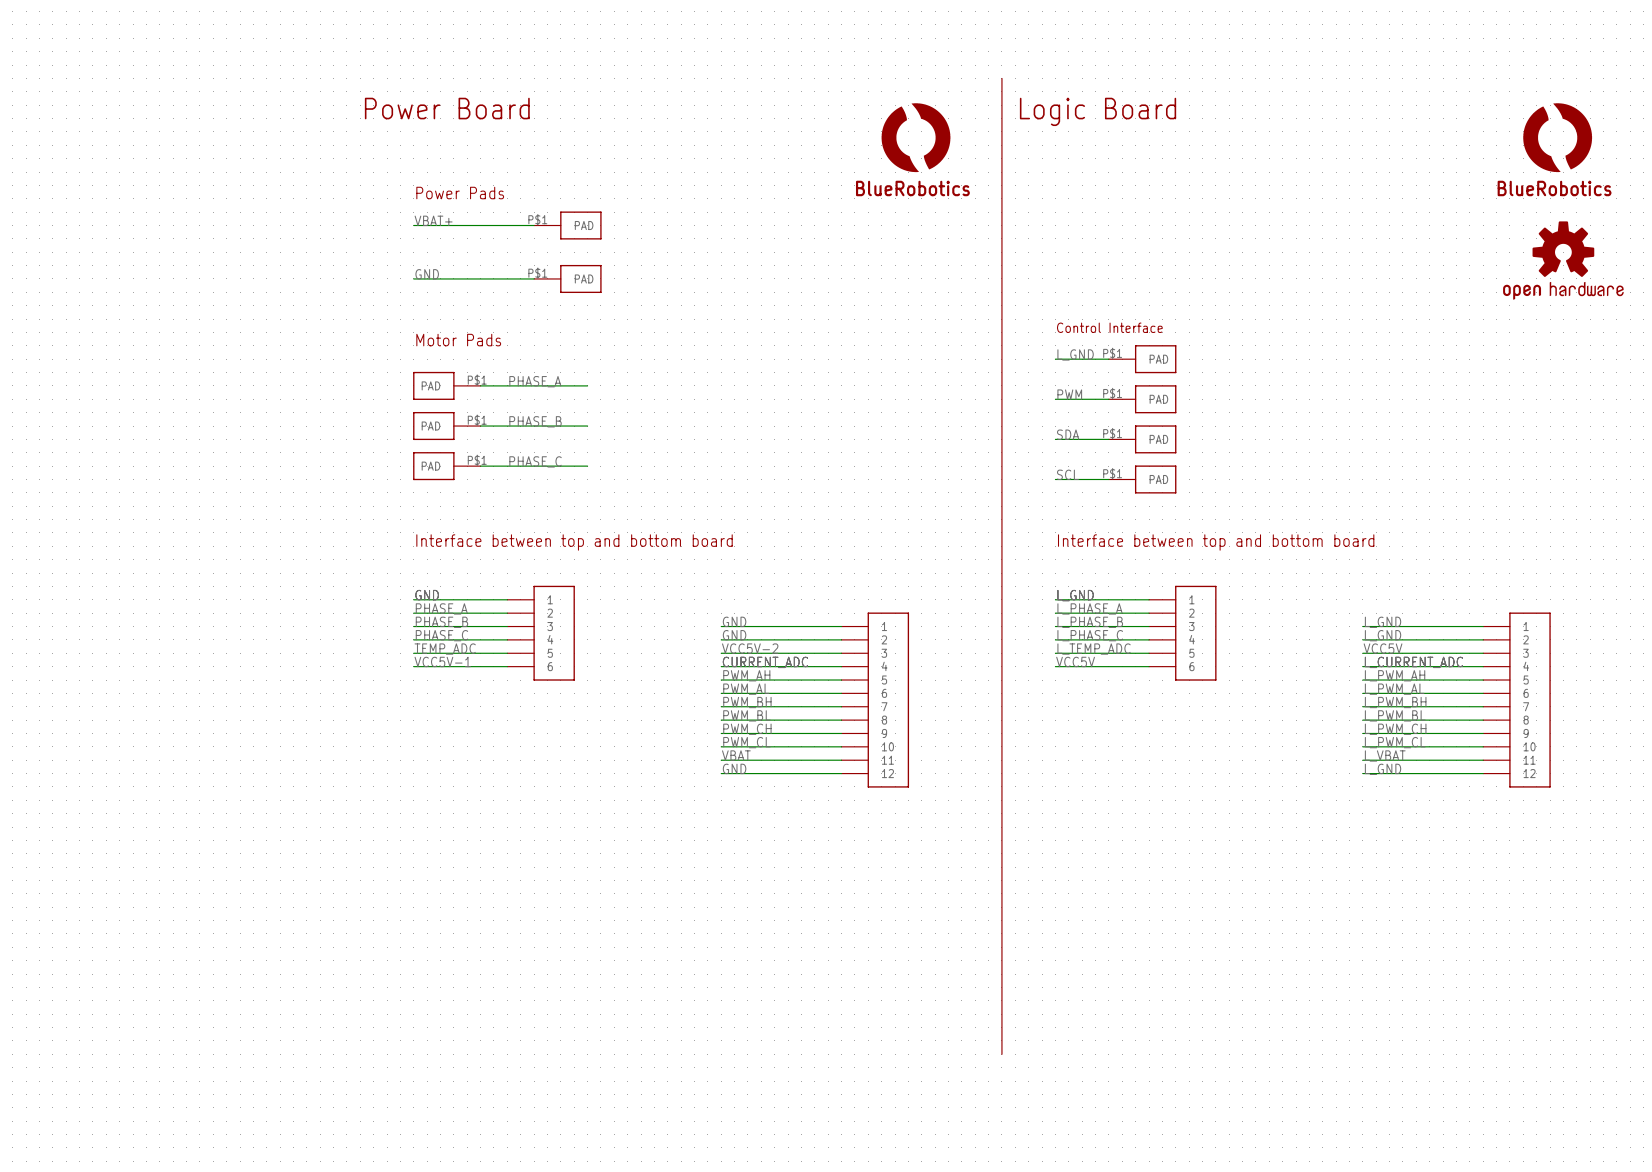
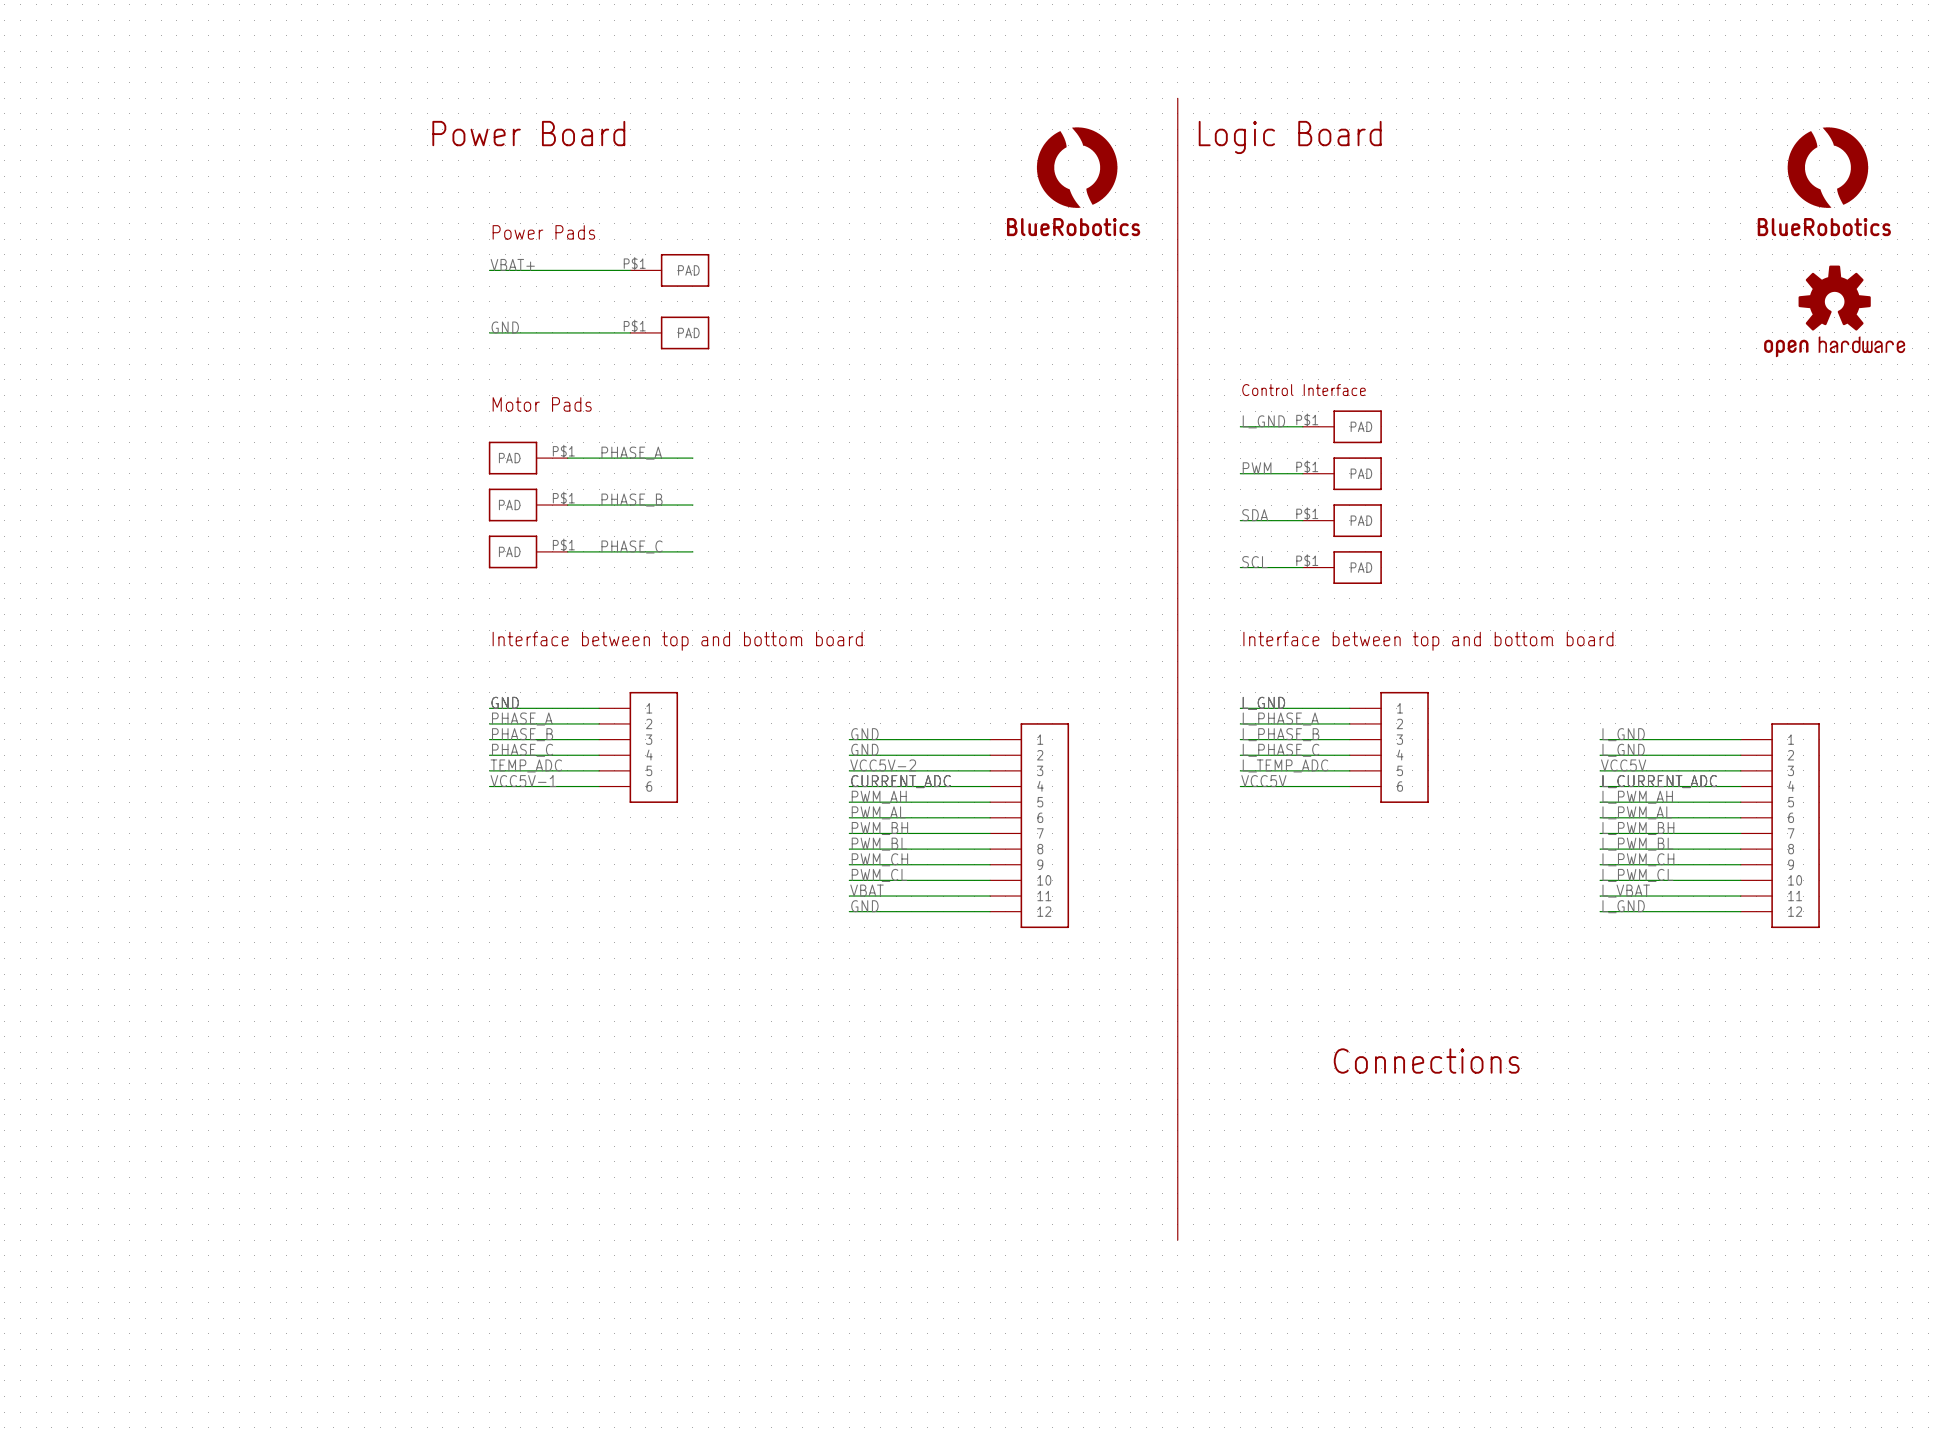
text: none -> Connections (1426, 1061)

